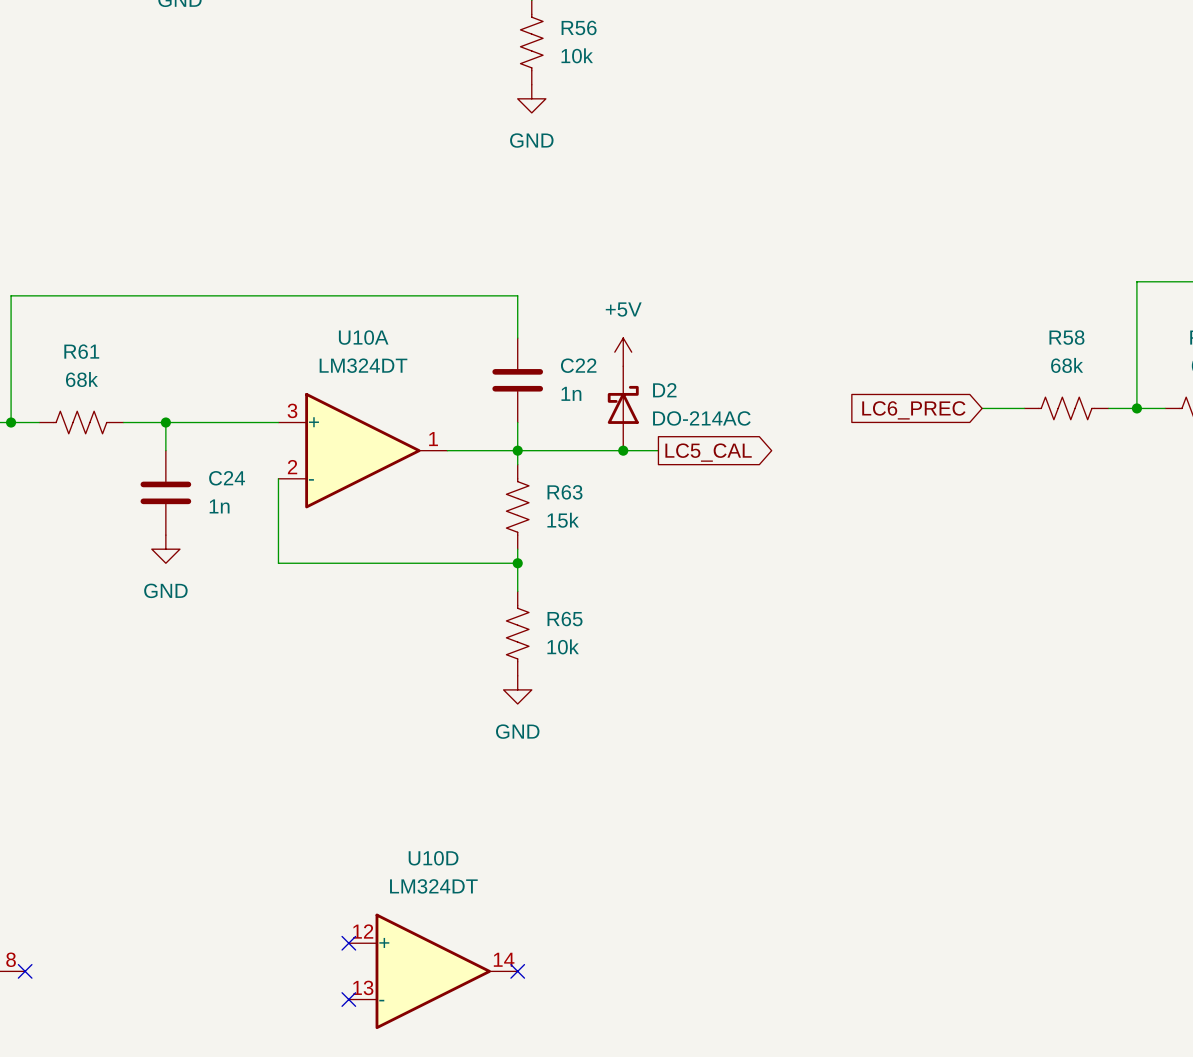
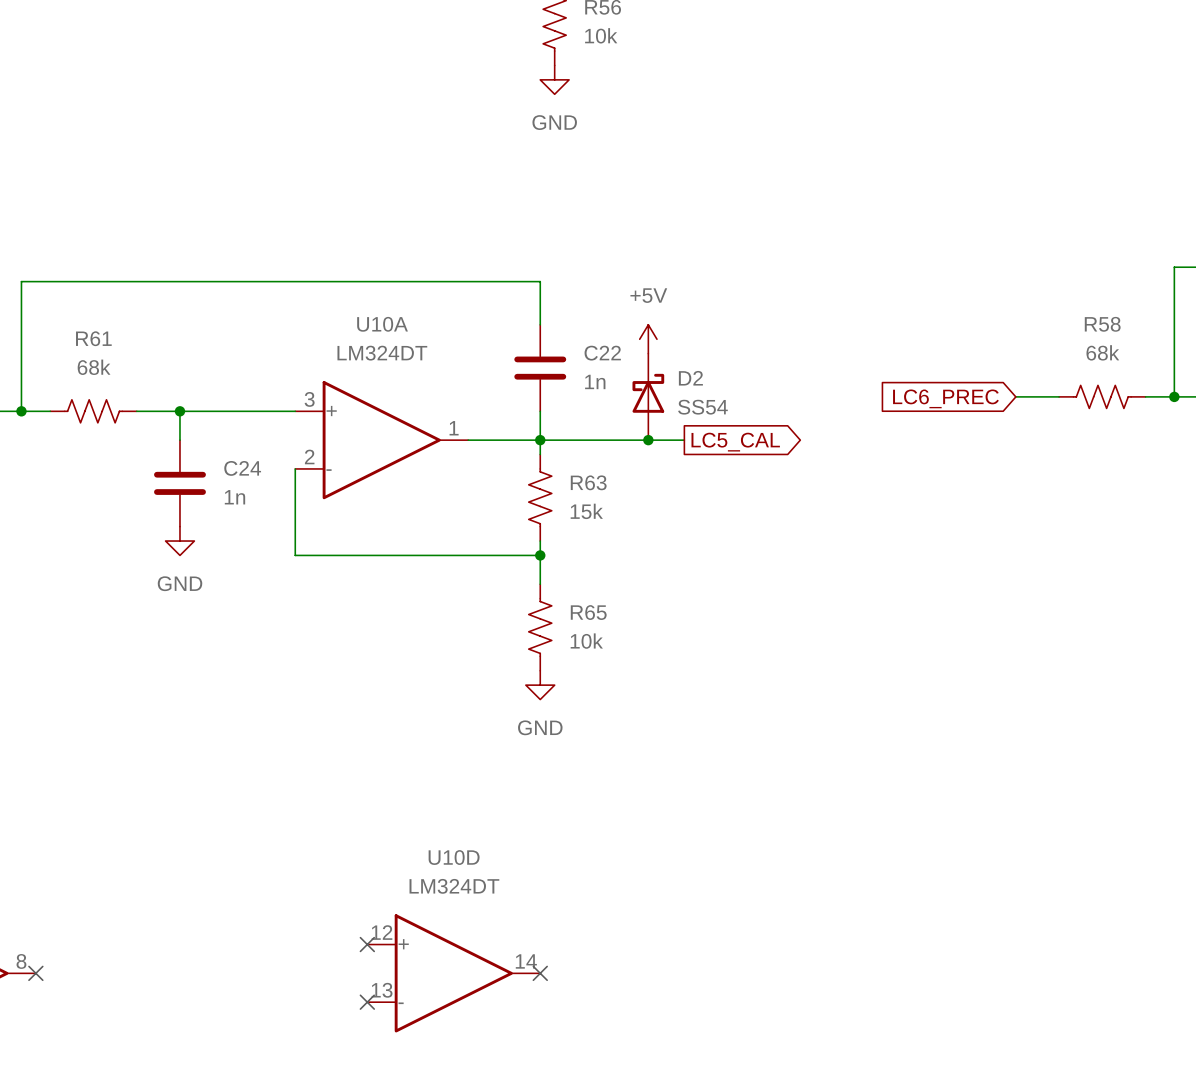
D2 value: DO-214AC (701, 418) -> SS54 (702, 407)

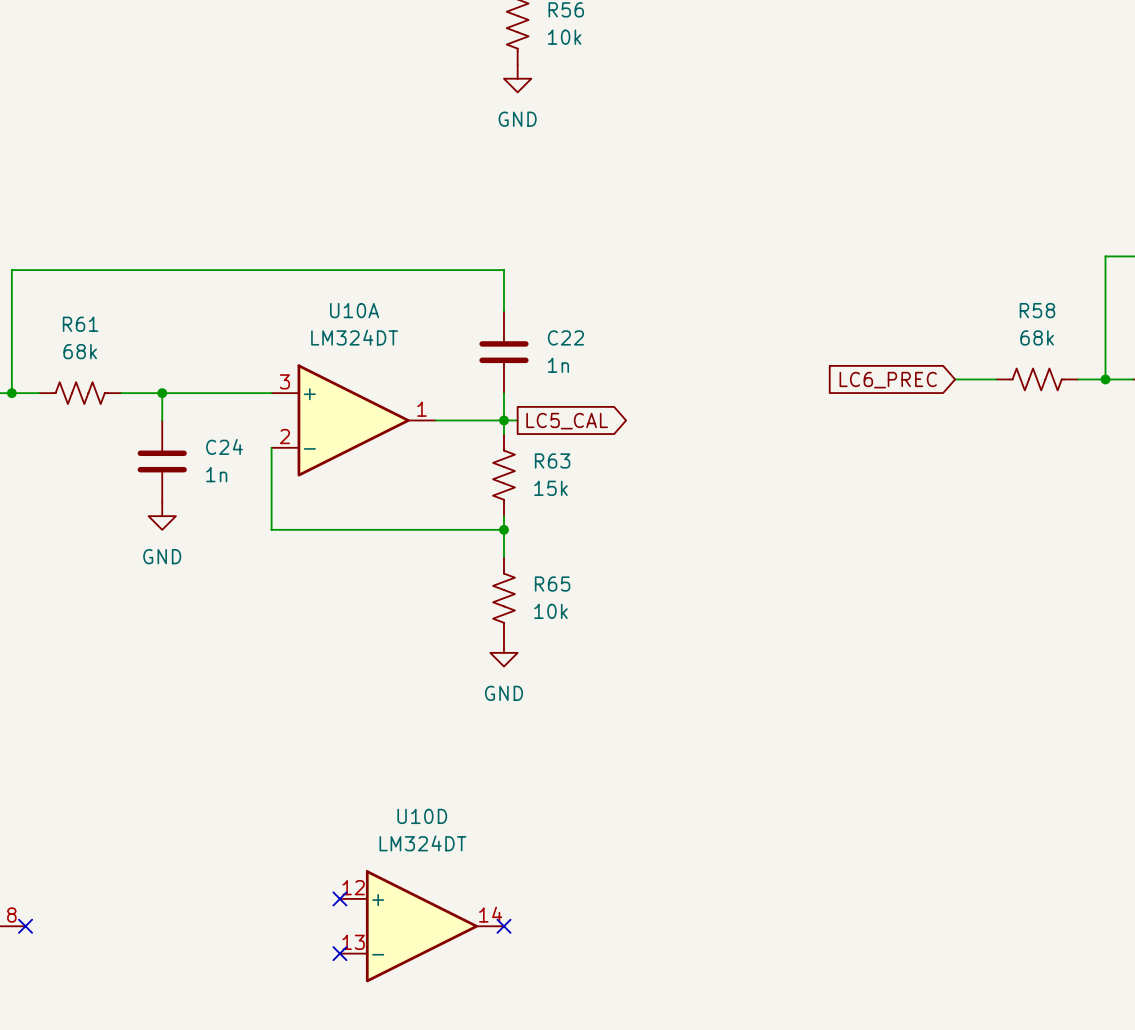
power symbol: +5V (648, 339) -> none
D2: SS54 (648, 396) -> none
wire: (554, 440) (684, 440) -> none
junction: (648, 440) -> none
global label position: LC5_CAL (735, 442) -> LC5_CAL (567, 421)

